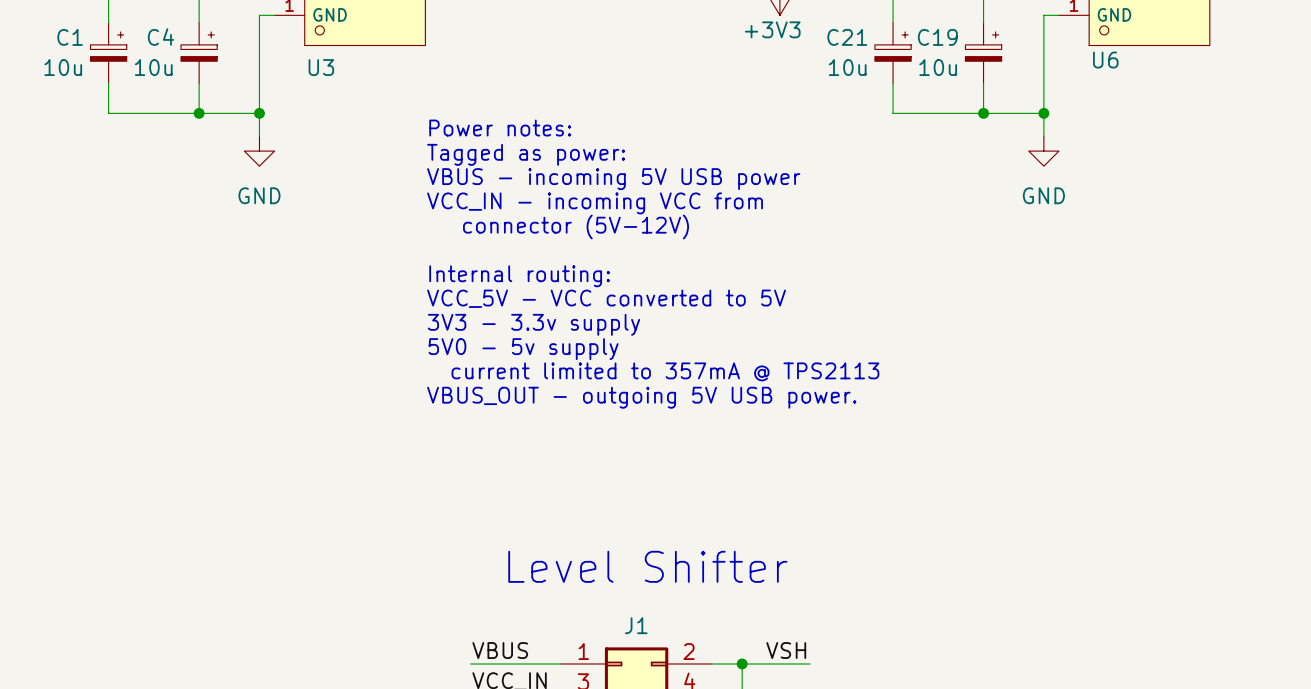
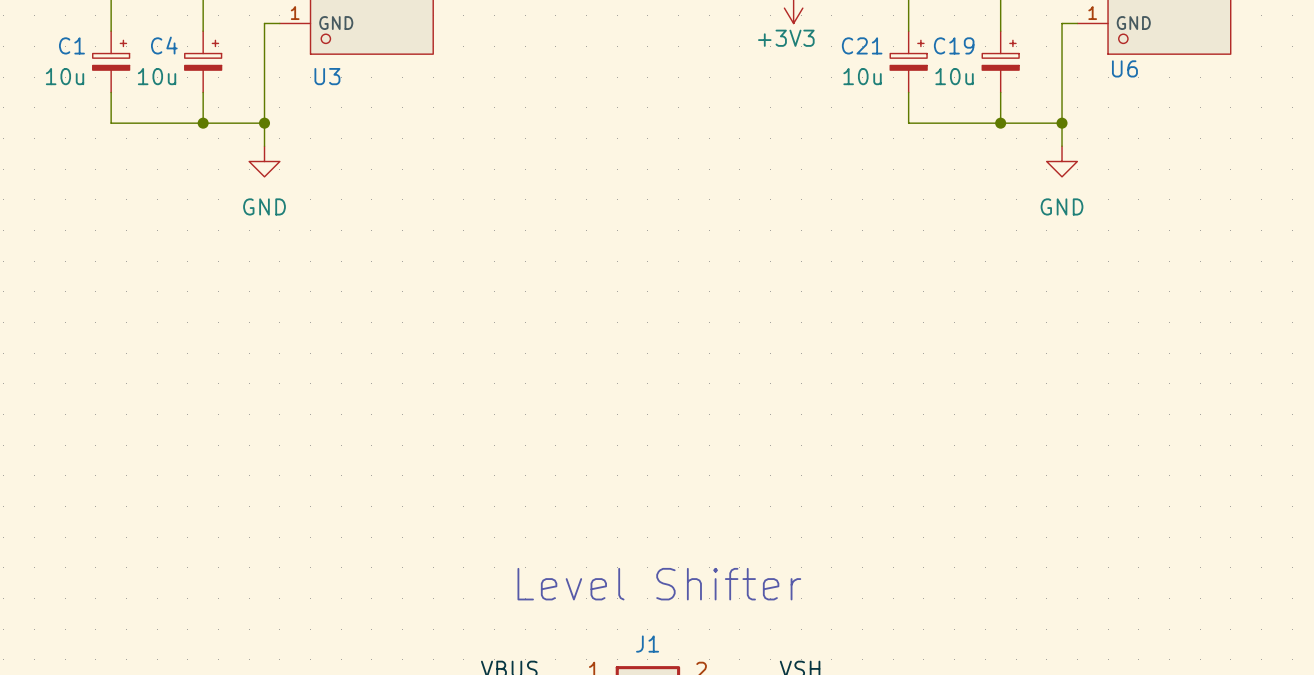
text: Power notes: (500, 128) -> none
text: Tagged as power: (526, 154) -> none
text: VBUS - incoming 5V USB power (613, 179) -> none
text: VCC_IN - incoming VCC from (595, 203) -> none
text: connector (5V-12V) (576, 226) -> none
text: Internal routing: (519, 276) -> none
text: VCC_5V - VCC converted to 5V (606, 298) -> none
text: 3V3 - 3.3v supply (533, 324) -> none
text: 5V0 - 5v supply (523, 349) -> none
text: current limited to 357mA @ TPS2113 (665, 371) -> none
text: VBUS_OUT - outgoing 5V USB power. (641, 397) -> none

